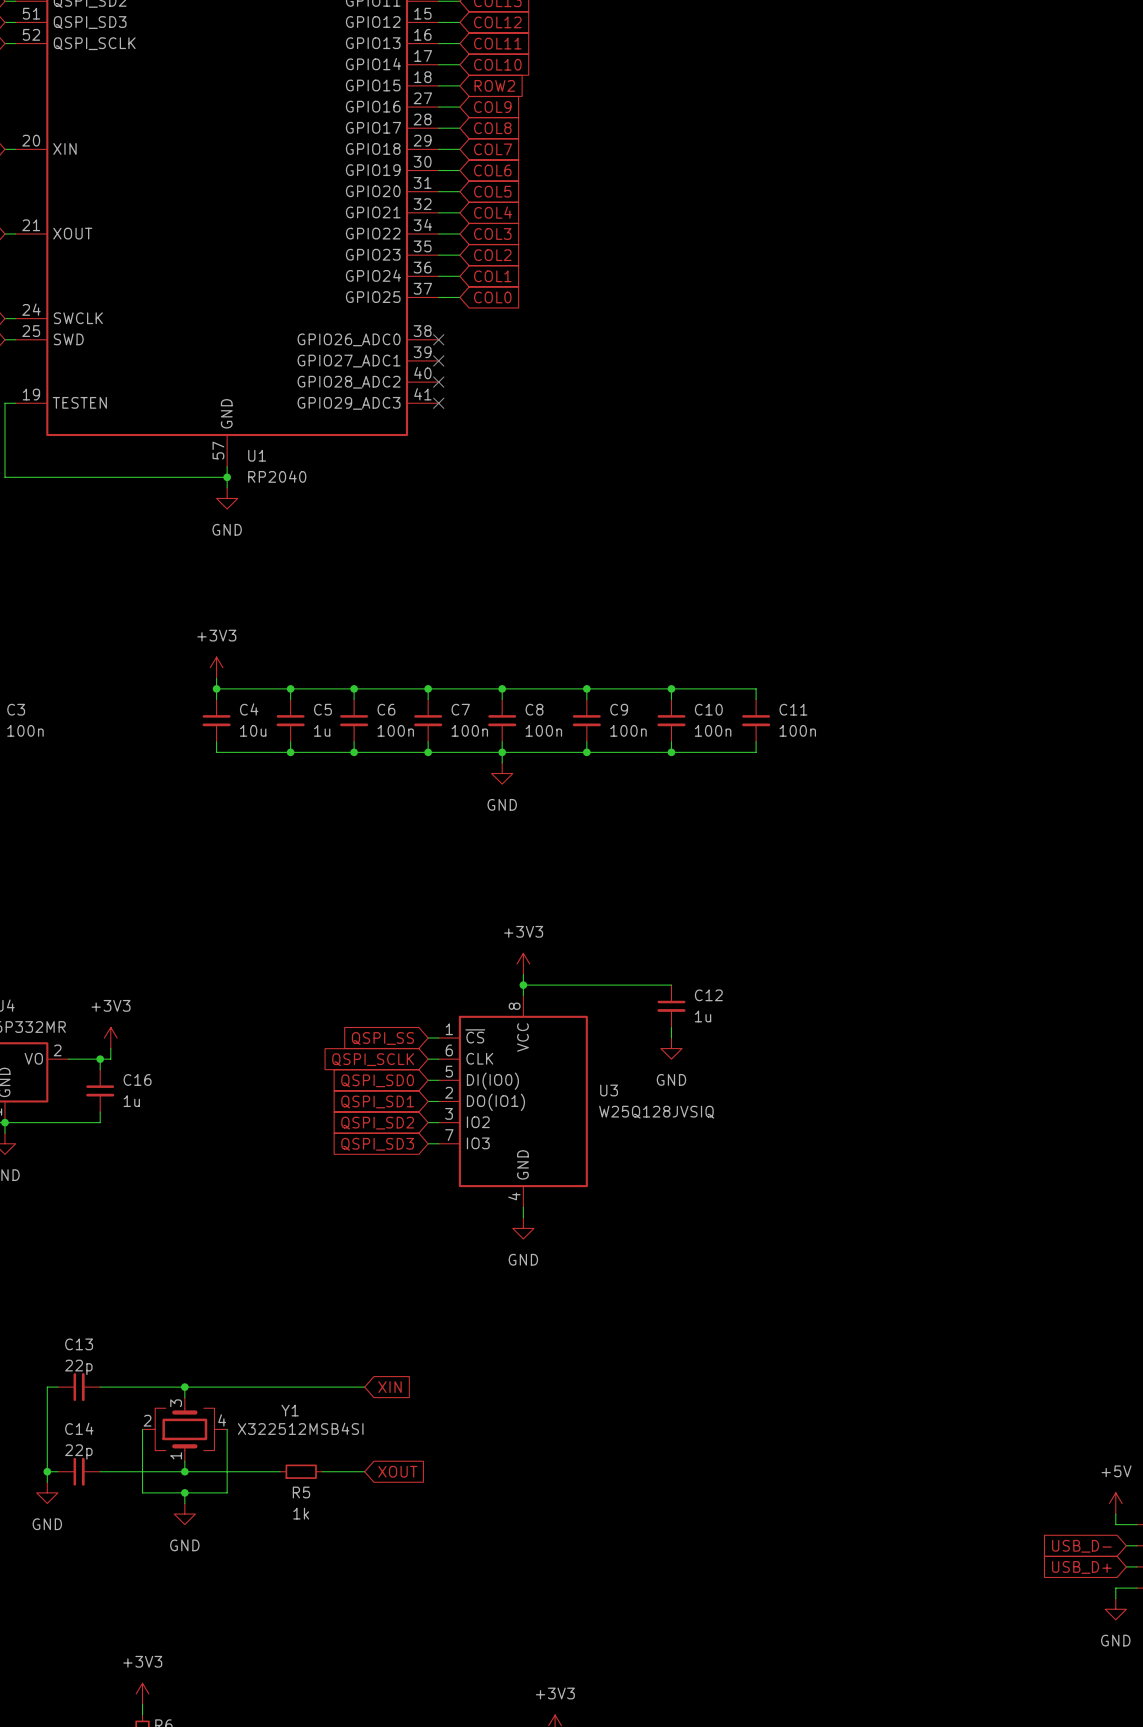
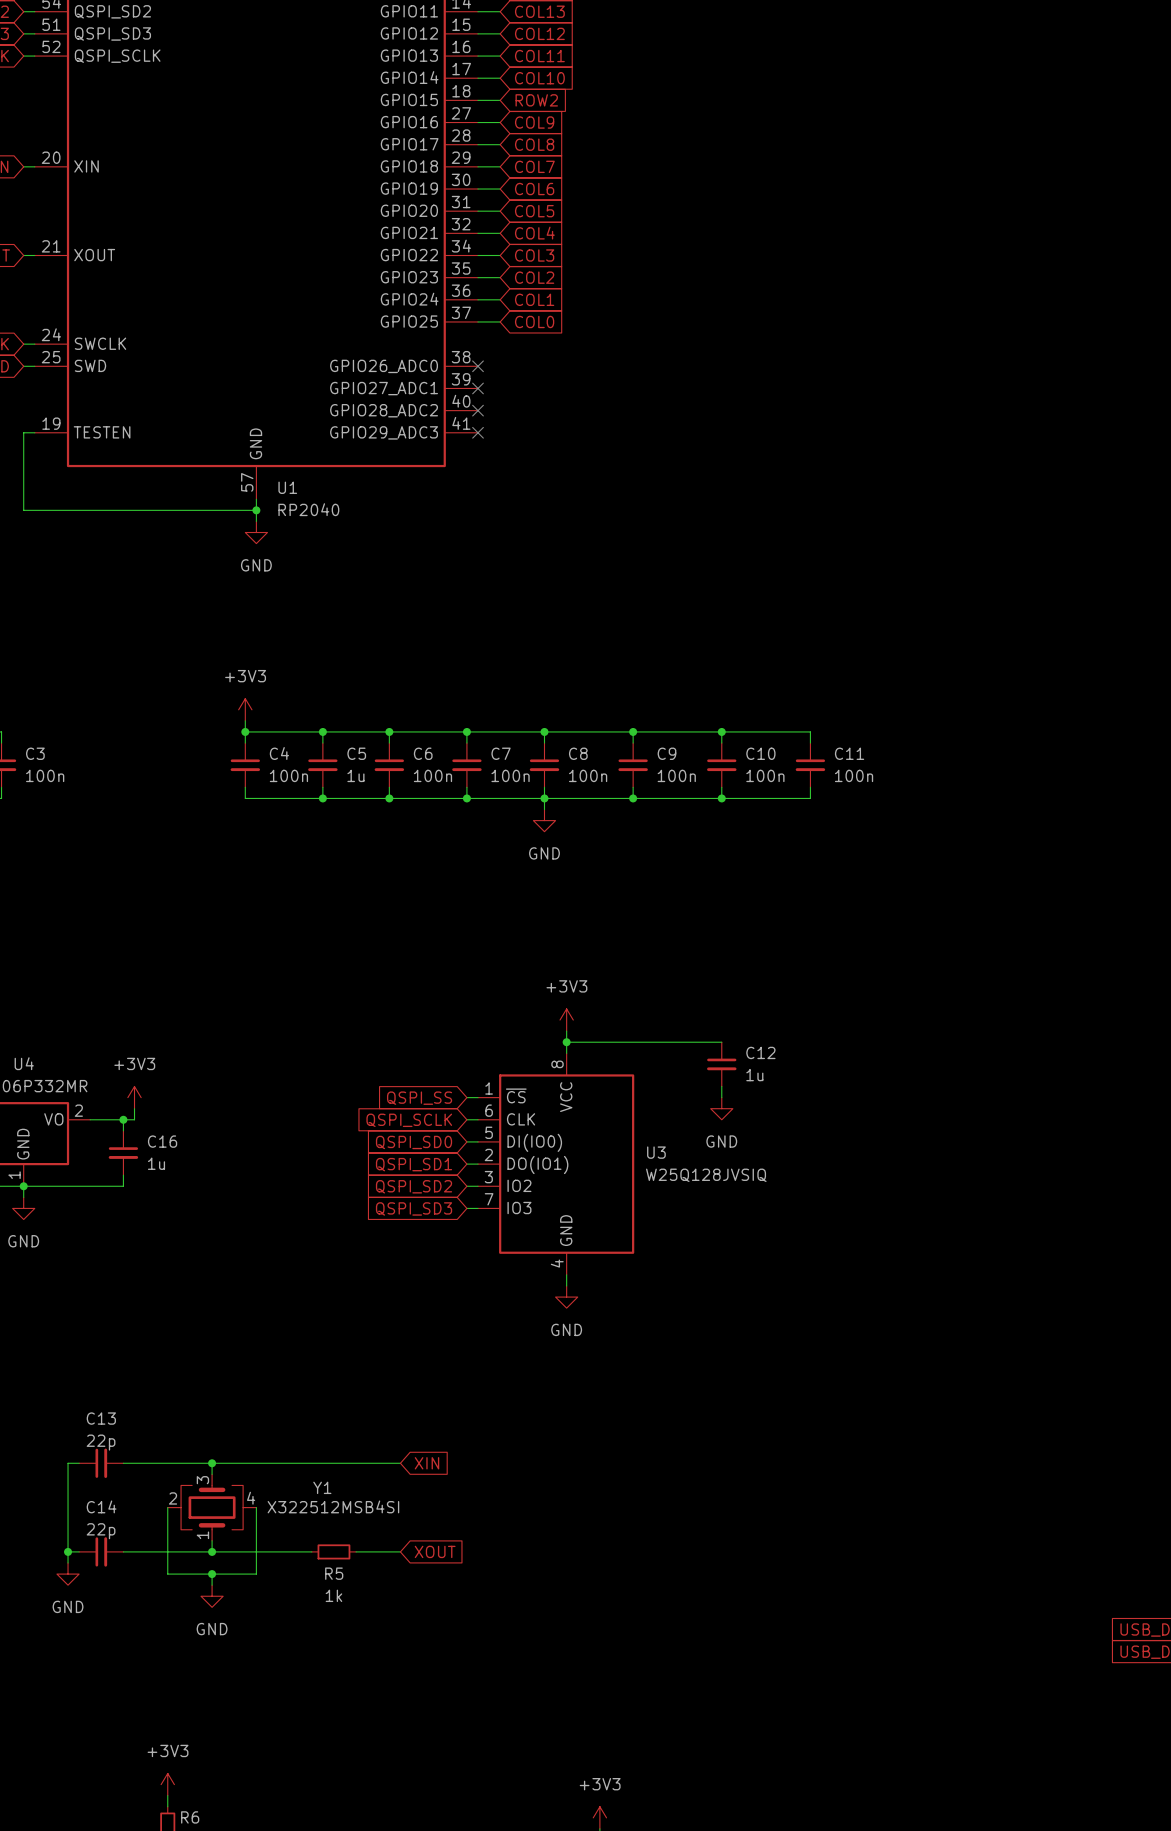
C4 value: 10u (253, 730) -> 100n (288, 775)

